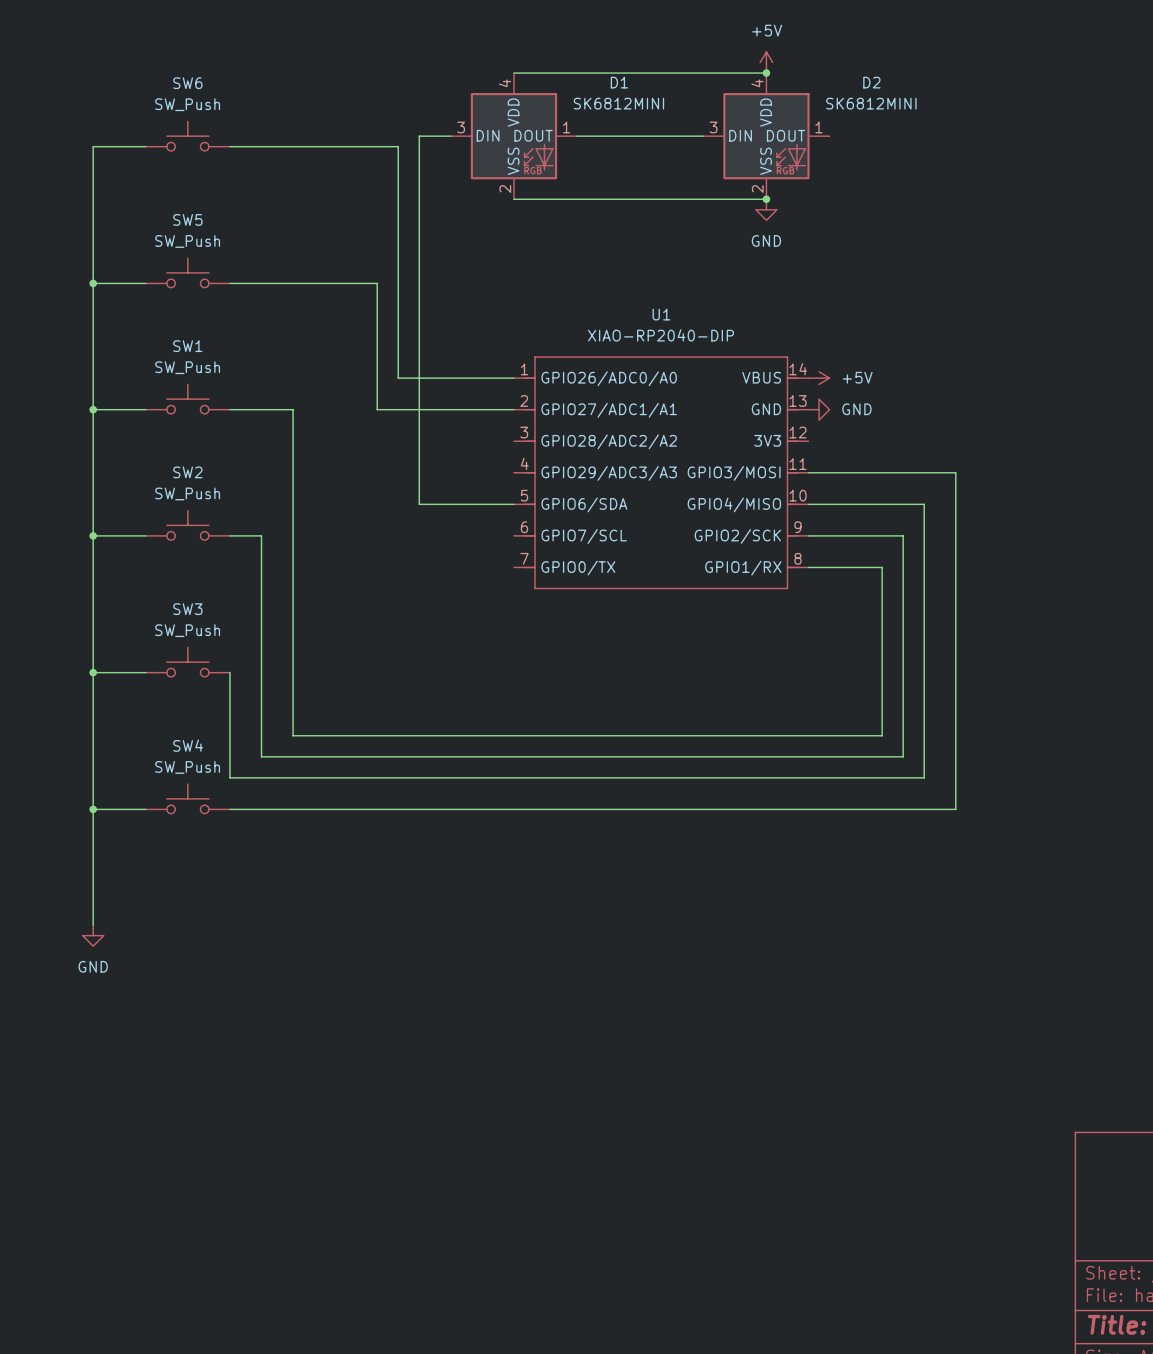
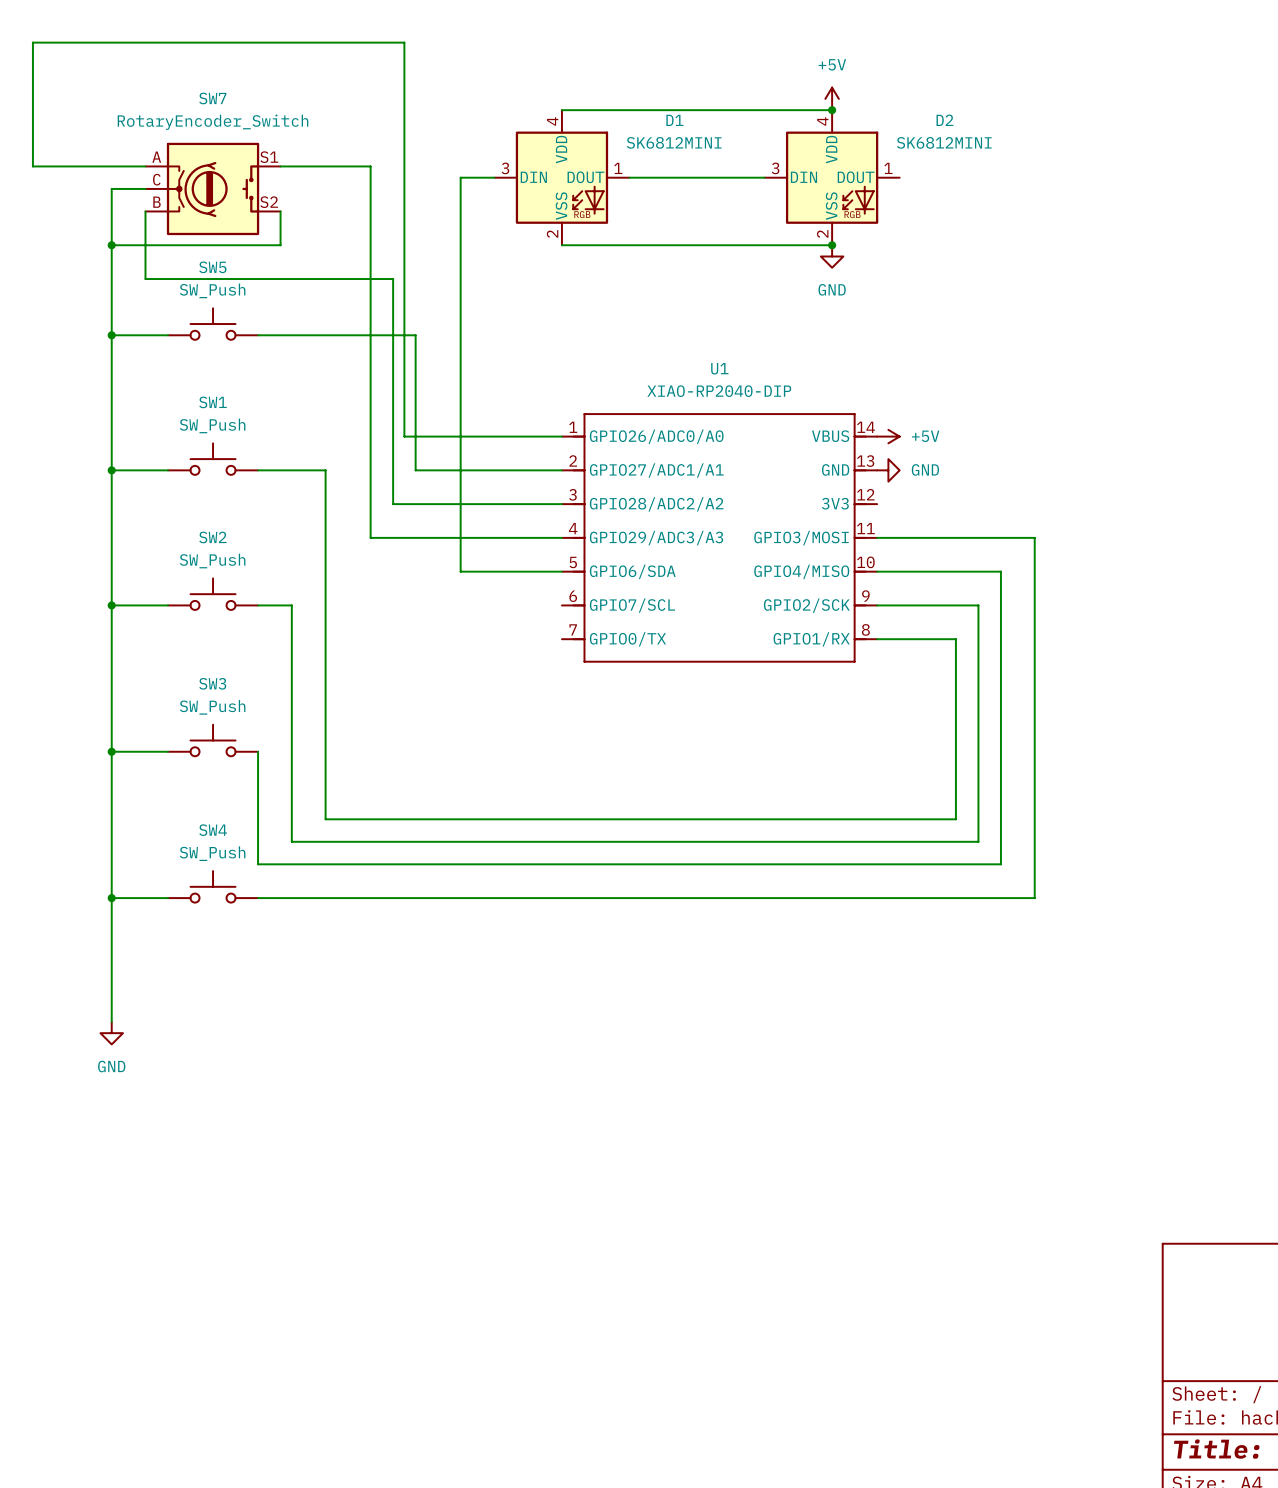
wire: none -> (280, 166) (370, 166) (370, 537) (561, 537)
SW6: SW_Push (187, 136) -> none
SW7: none -> RotaryEncoder_Switch (213, 188)
wire: (229, 146) (398, 146) (398, 378) -> (145, 166) (32, 166) (32, 42) (404, 42) (404, 436) (438, 436)
wire: none -> (145, 211) (145, 279) (393, 279) (393, 504) (561, 504)
wire: none -> (280, 211) (280, 245) (111, 245)
junction: none -> (111, 245)

